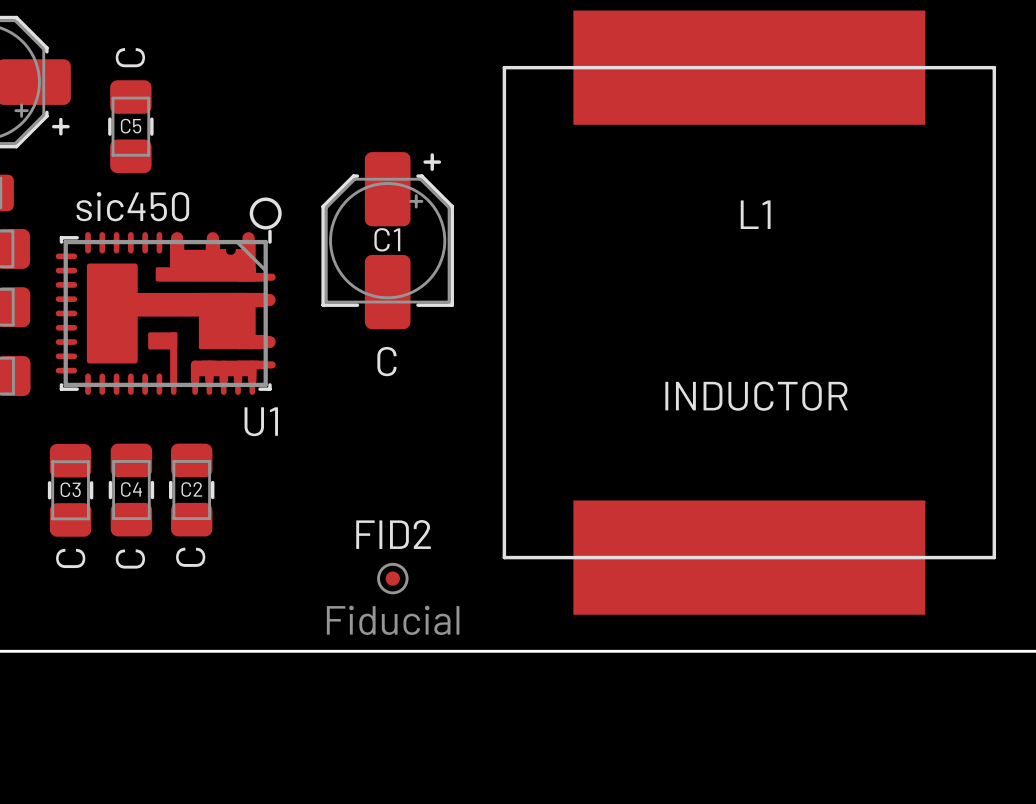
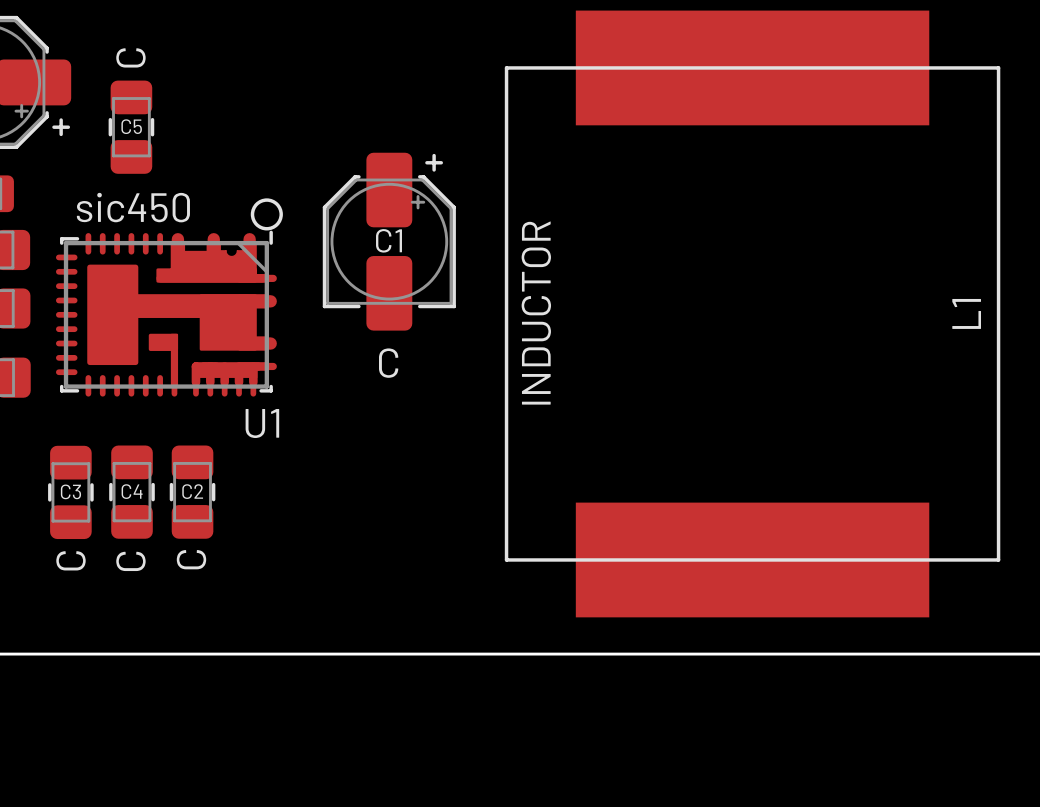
L1 name rotation: 0° (755, 214) -> 90° counterclockwise (966, 313)
L1 name position: L1 (755, 214) -> L1 (966, 313)
L1 value rotation: 0° (756, 396) -> 90° counterclockwise (536, 313)
FID2: Fiducial (392, 578) -> none

